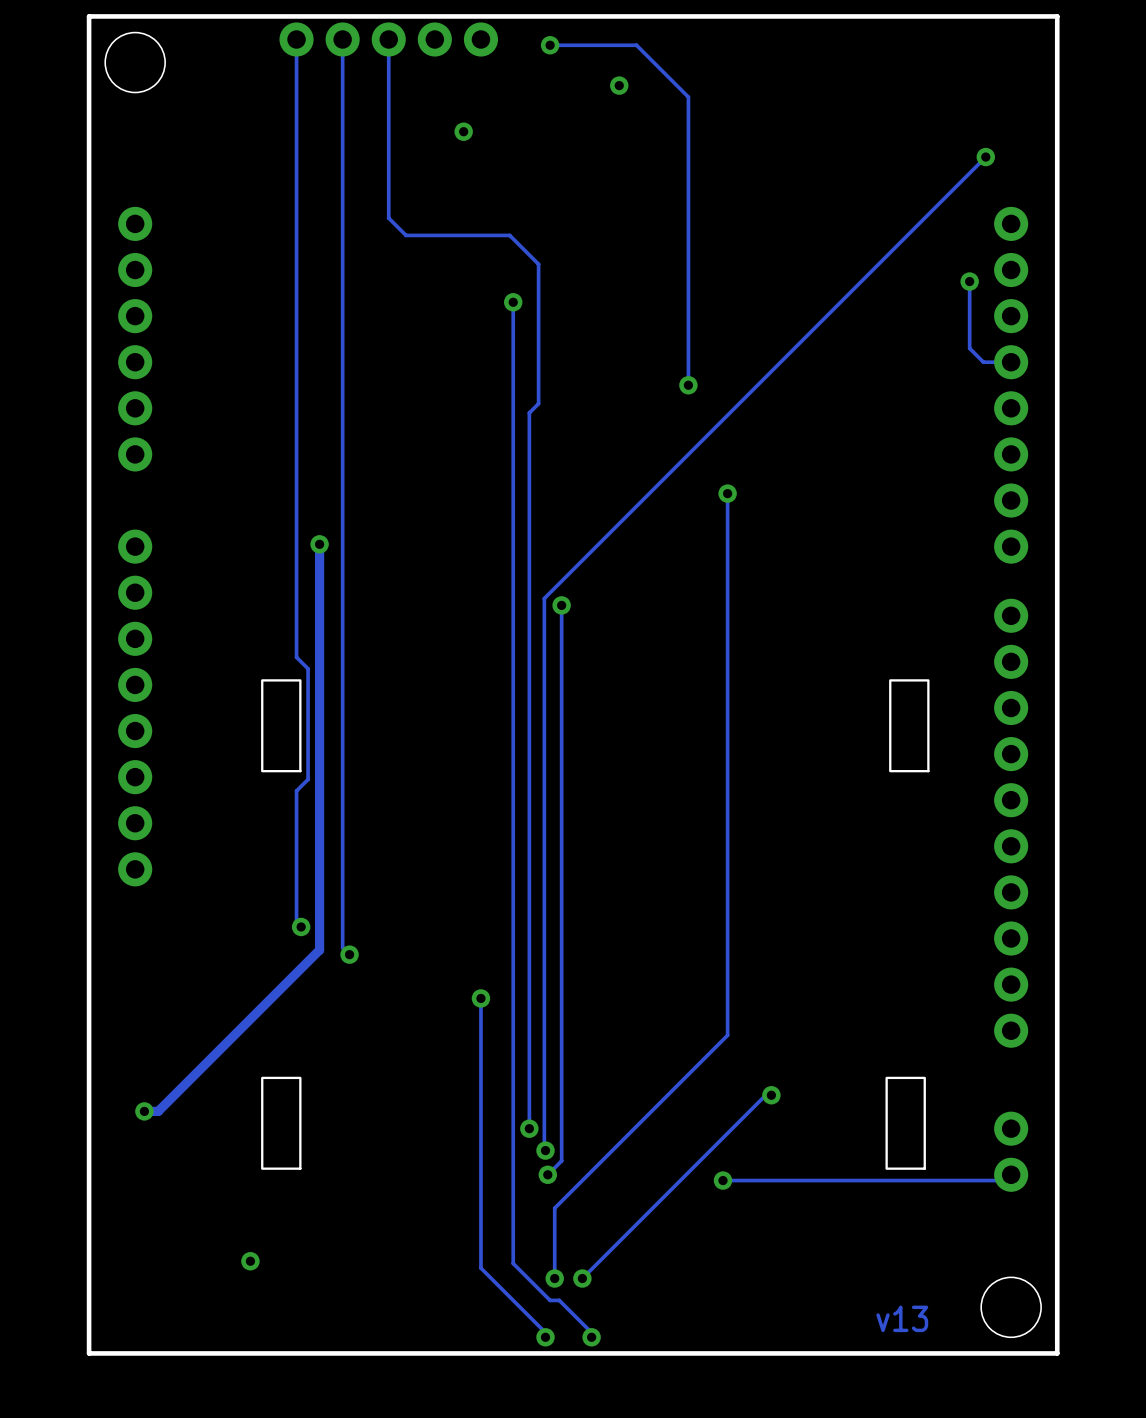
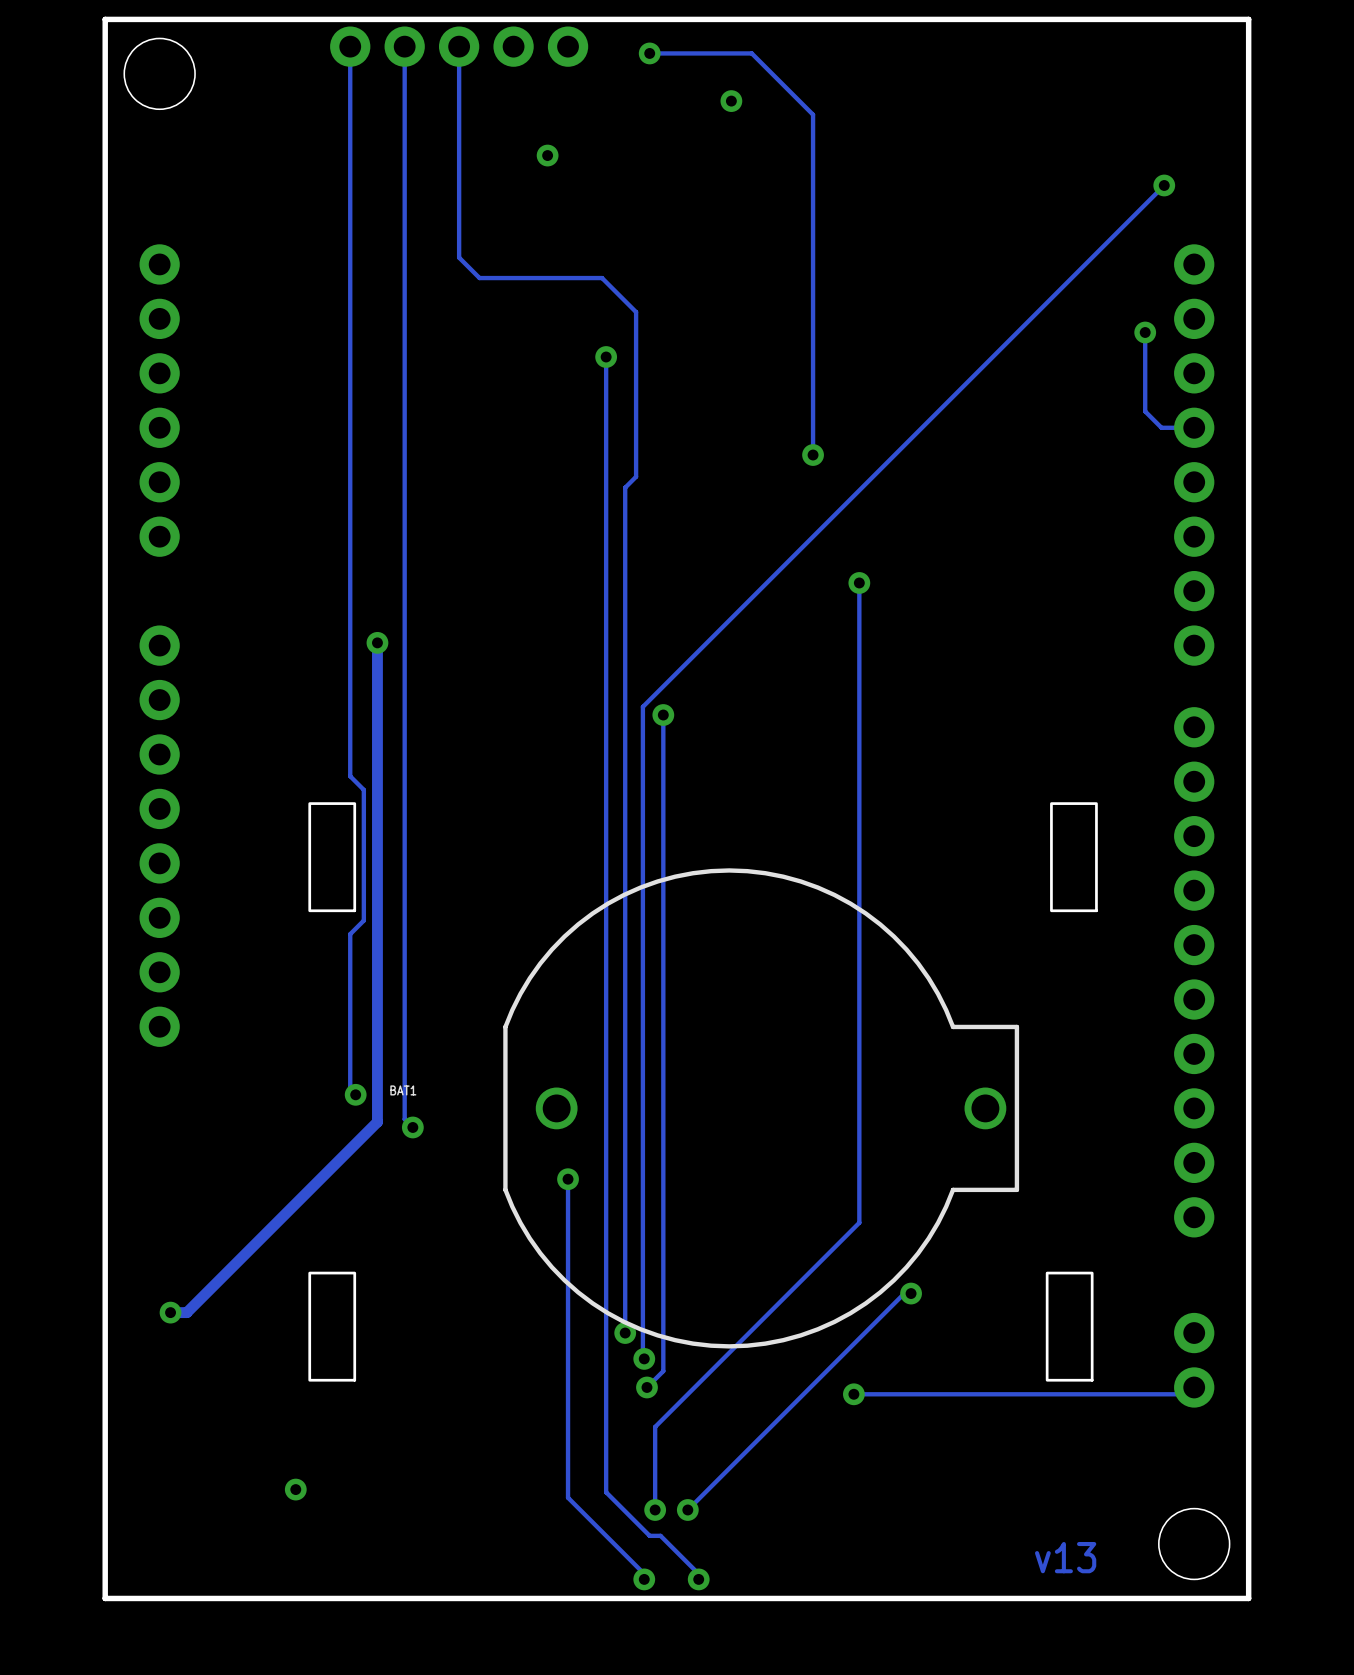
BAT1: none -> (761, 1108)

